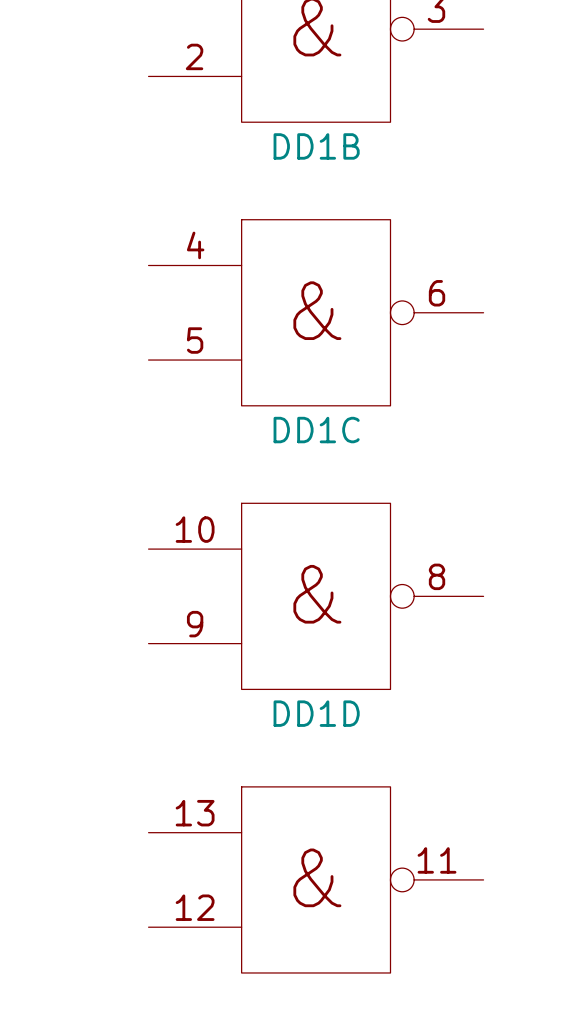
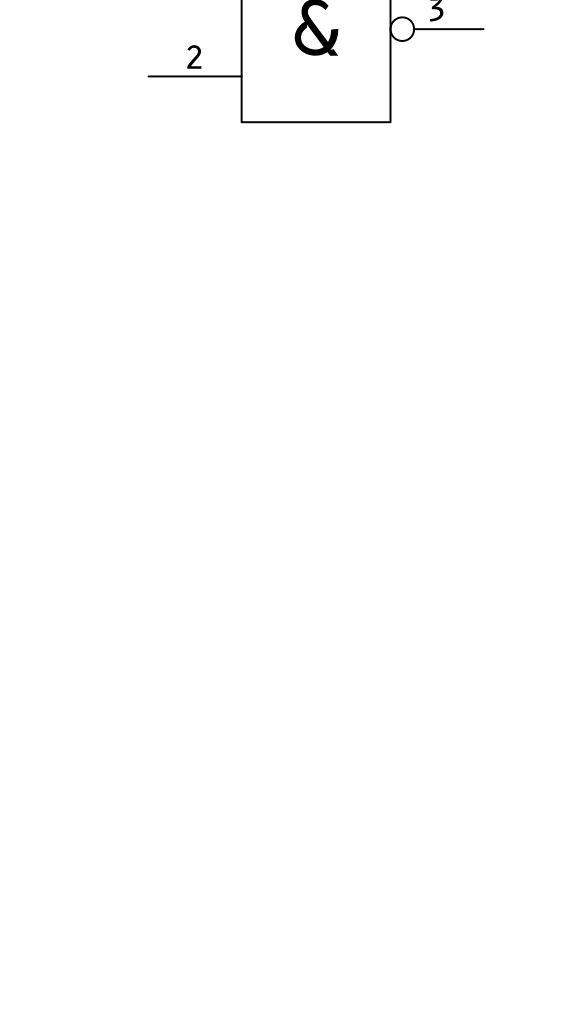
DD1B: (316, 312) -> none
DD1C: (316, 596) -> none
DD1D: (316, 879) -> none

